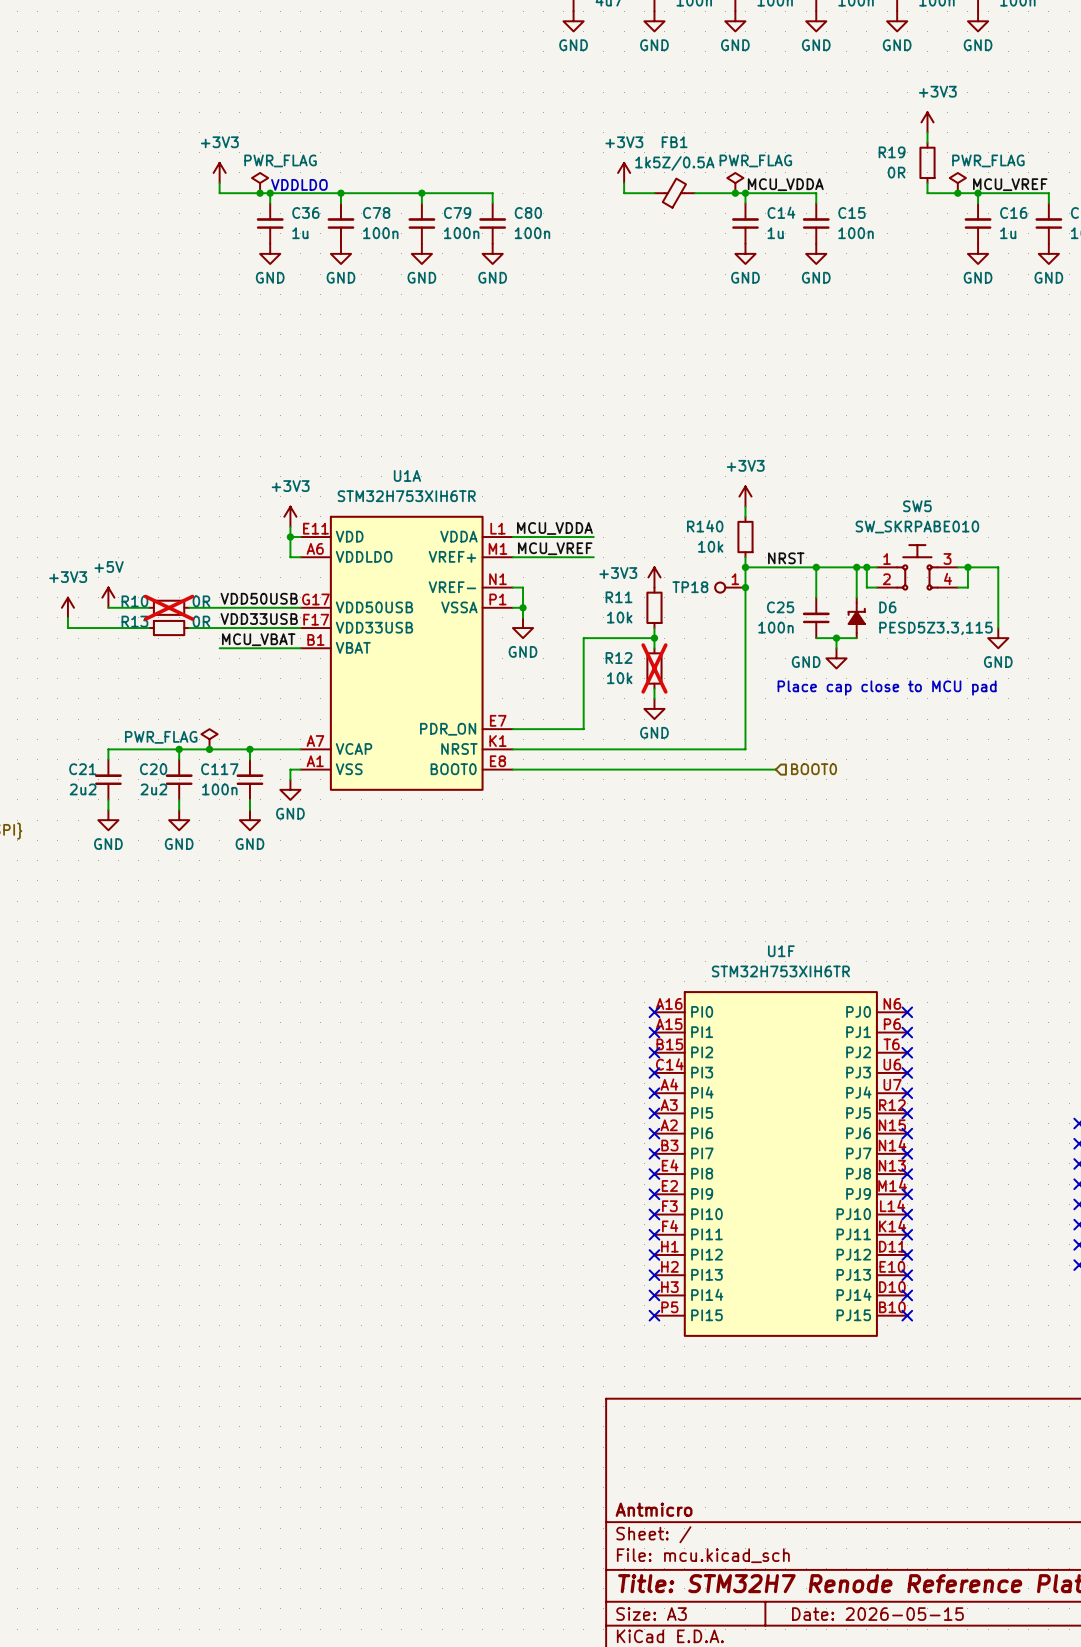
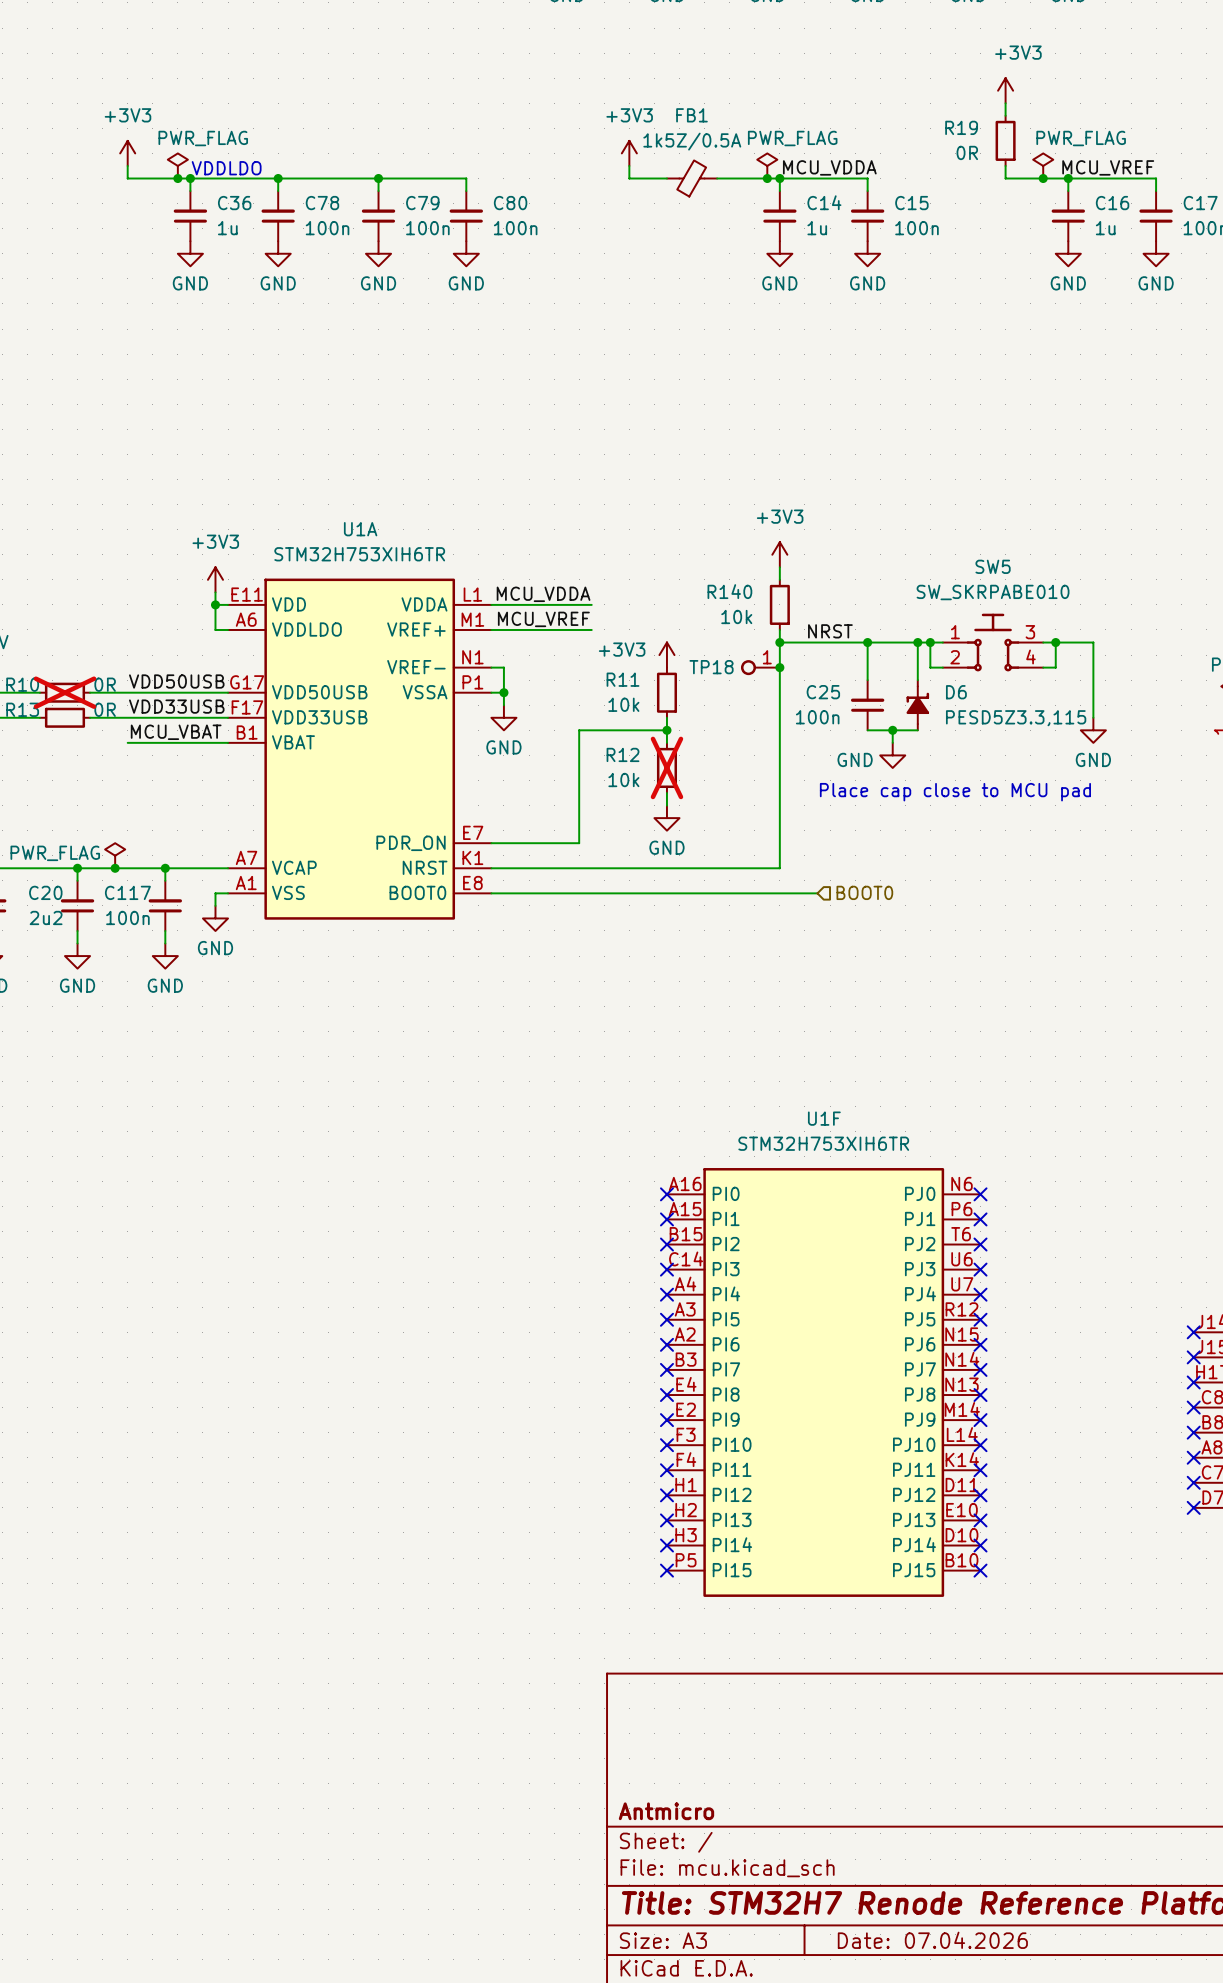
title block: Date: 2026-05-15 (877, 1614) -> Date: 07.04.2026 (932, 1940)

